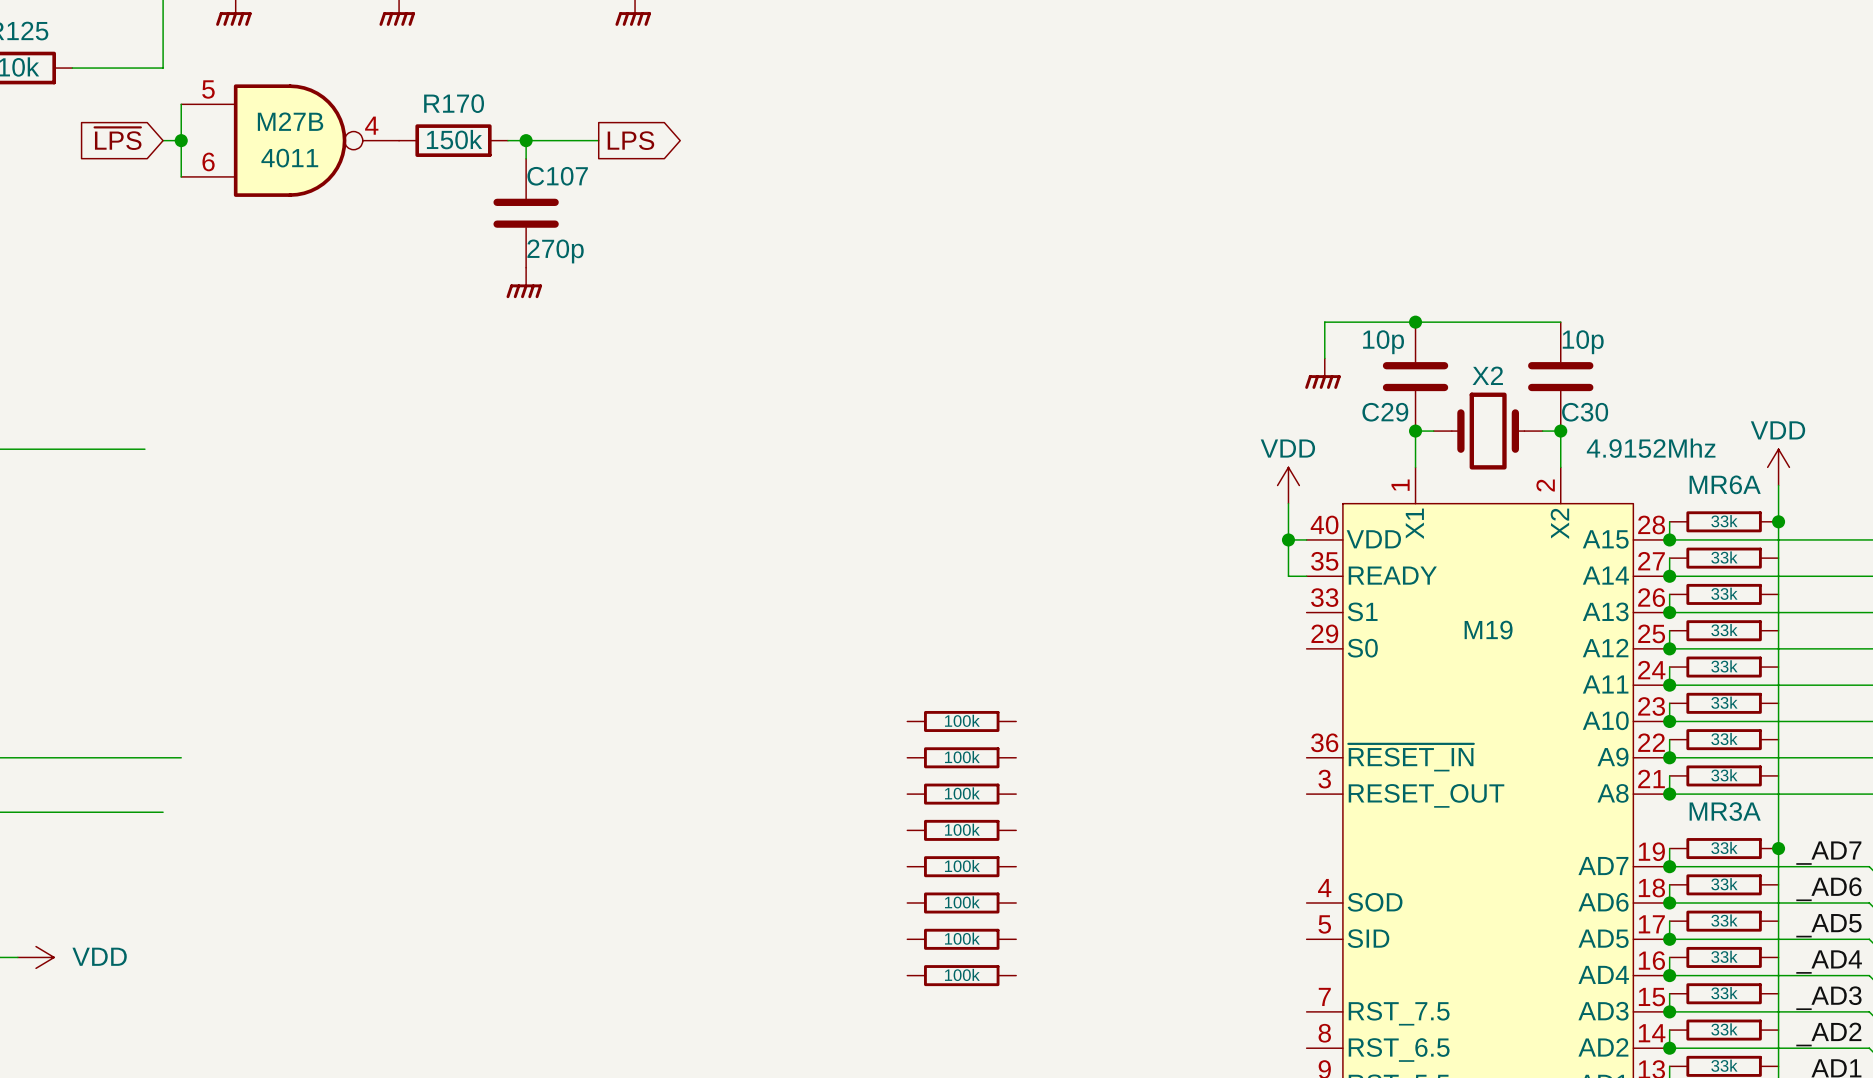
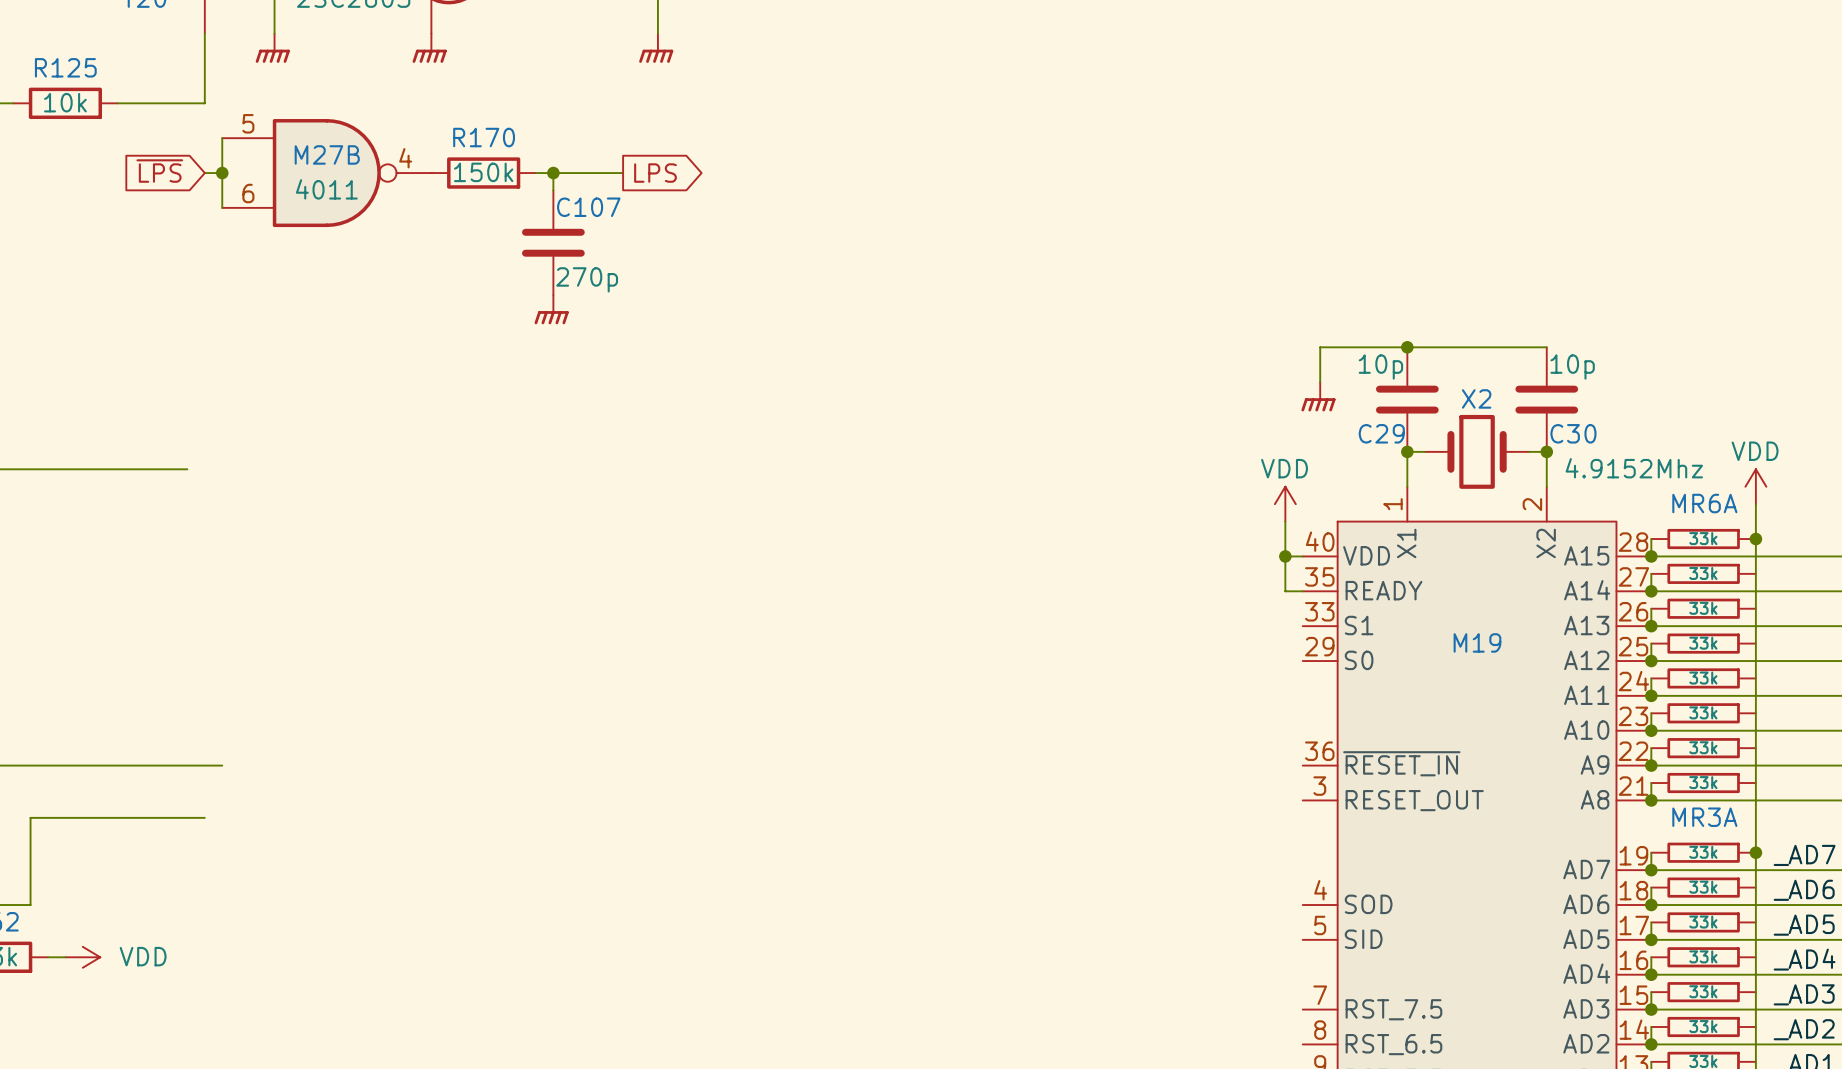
part: 100k (961, 721) -> none
part: 100k (961, 757) -> none
part: 100k (961, 794) -> none
part: 100k (961, 830) -> none
part: 100k (961, 866) -> none
part: 100k (961, 902) -> none
part: 100k (961, 939) -> none
part: 100k (961, 975) -> none

